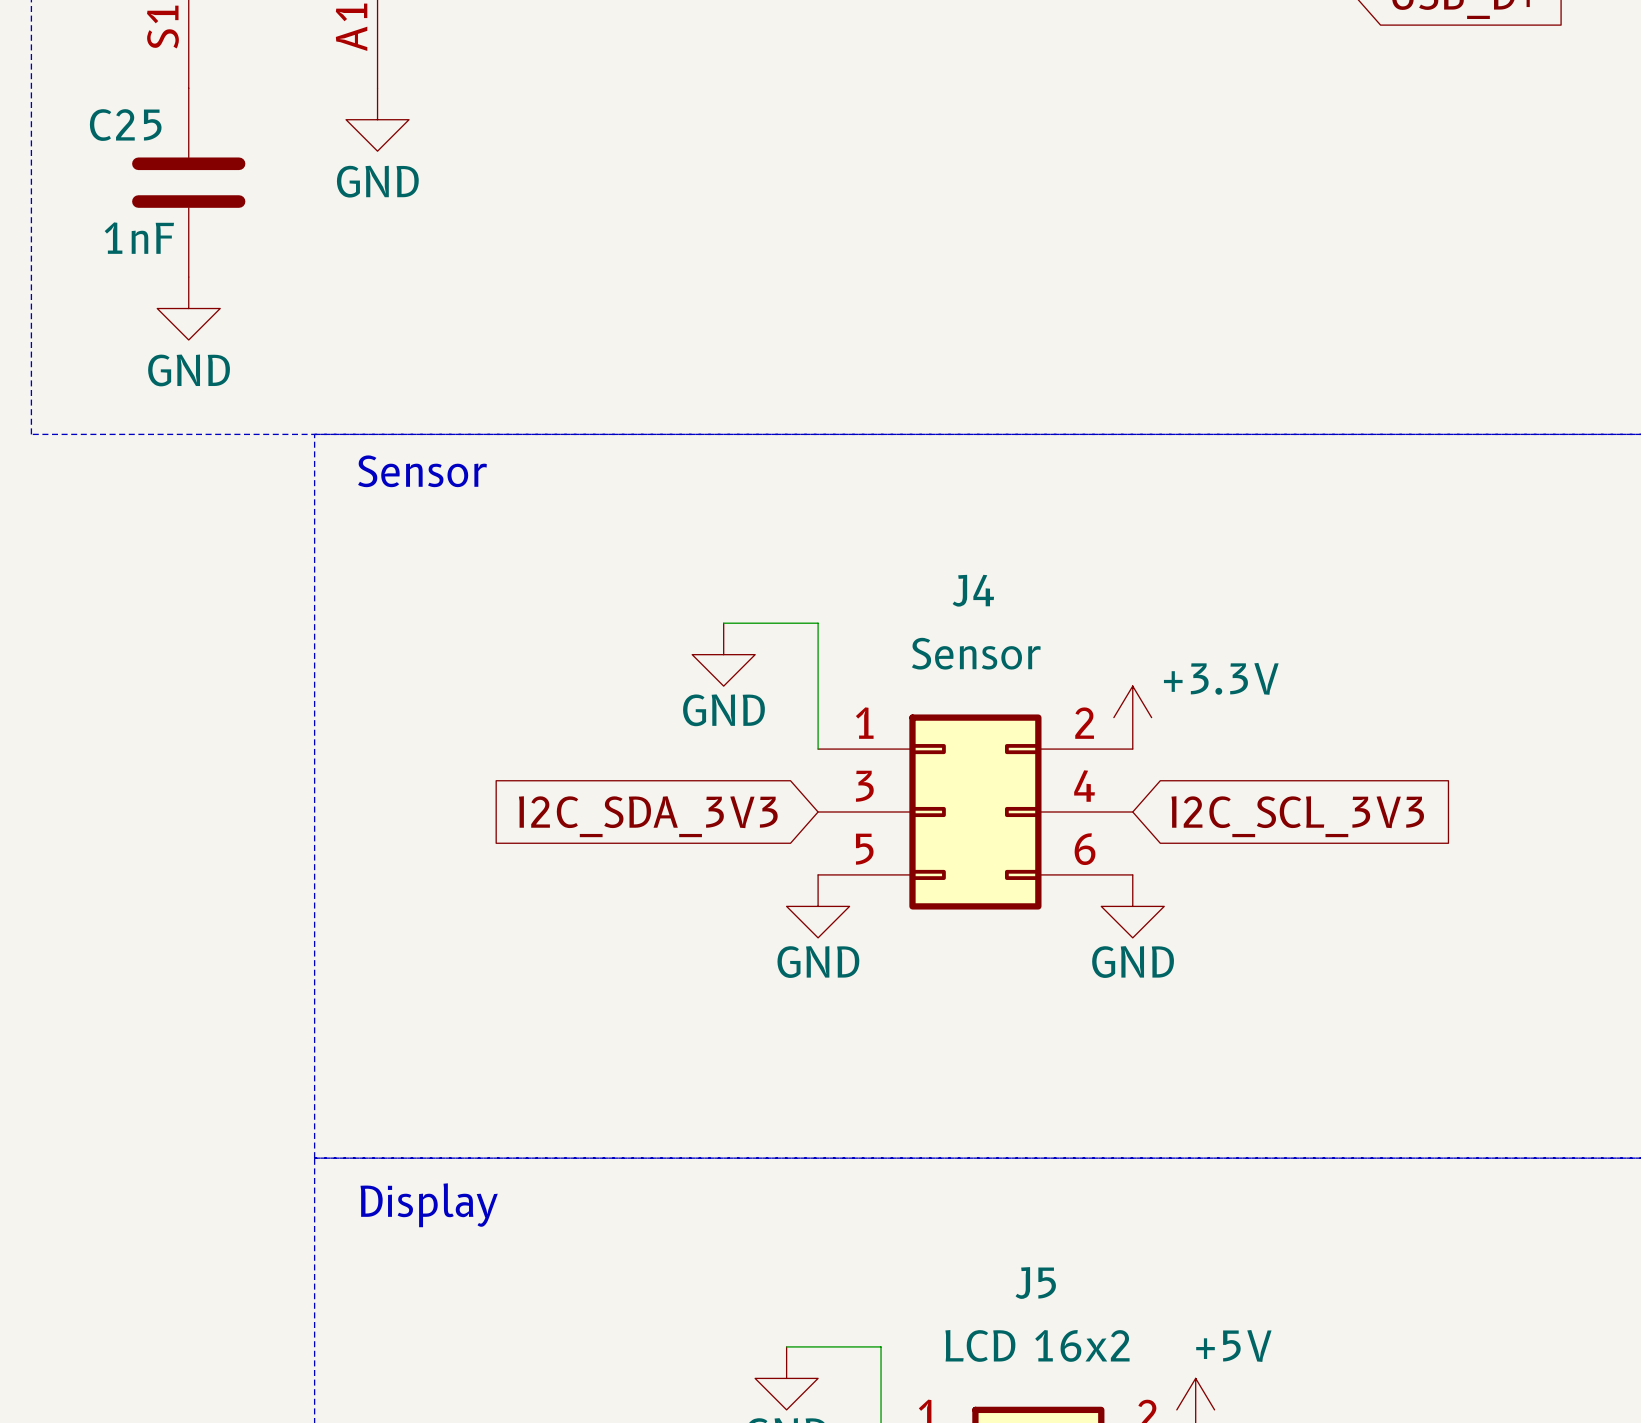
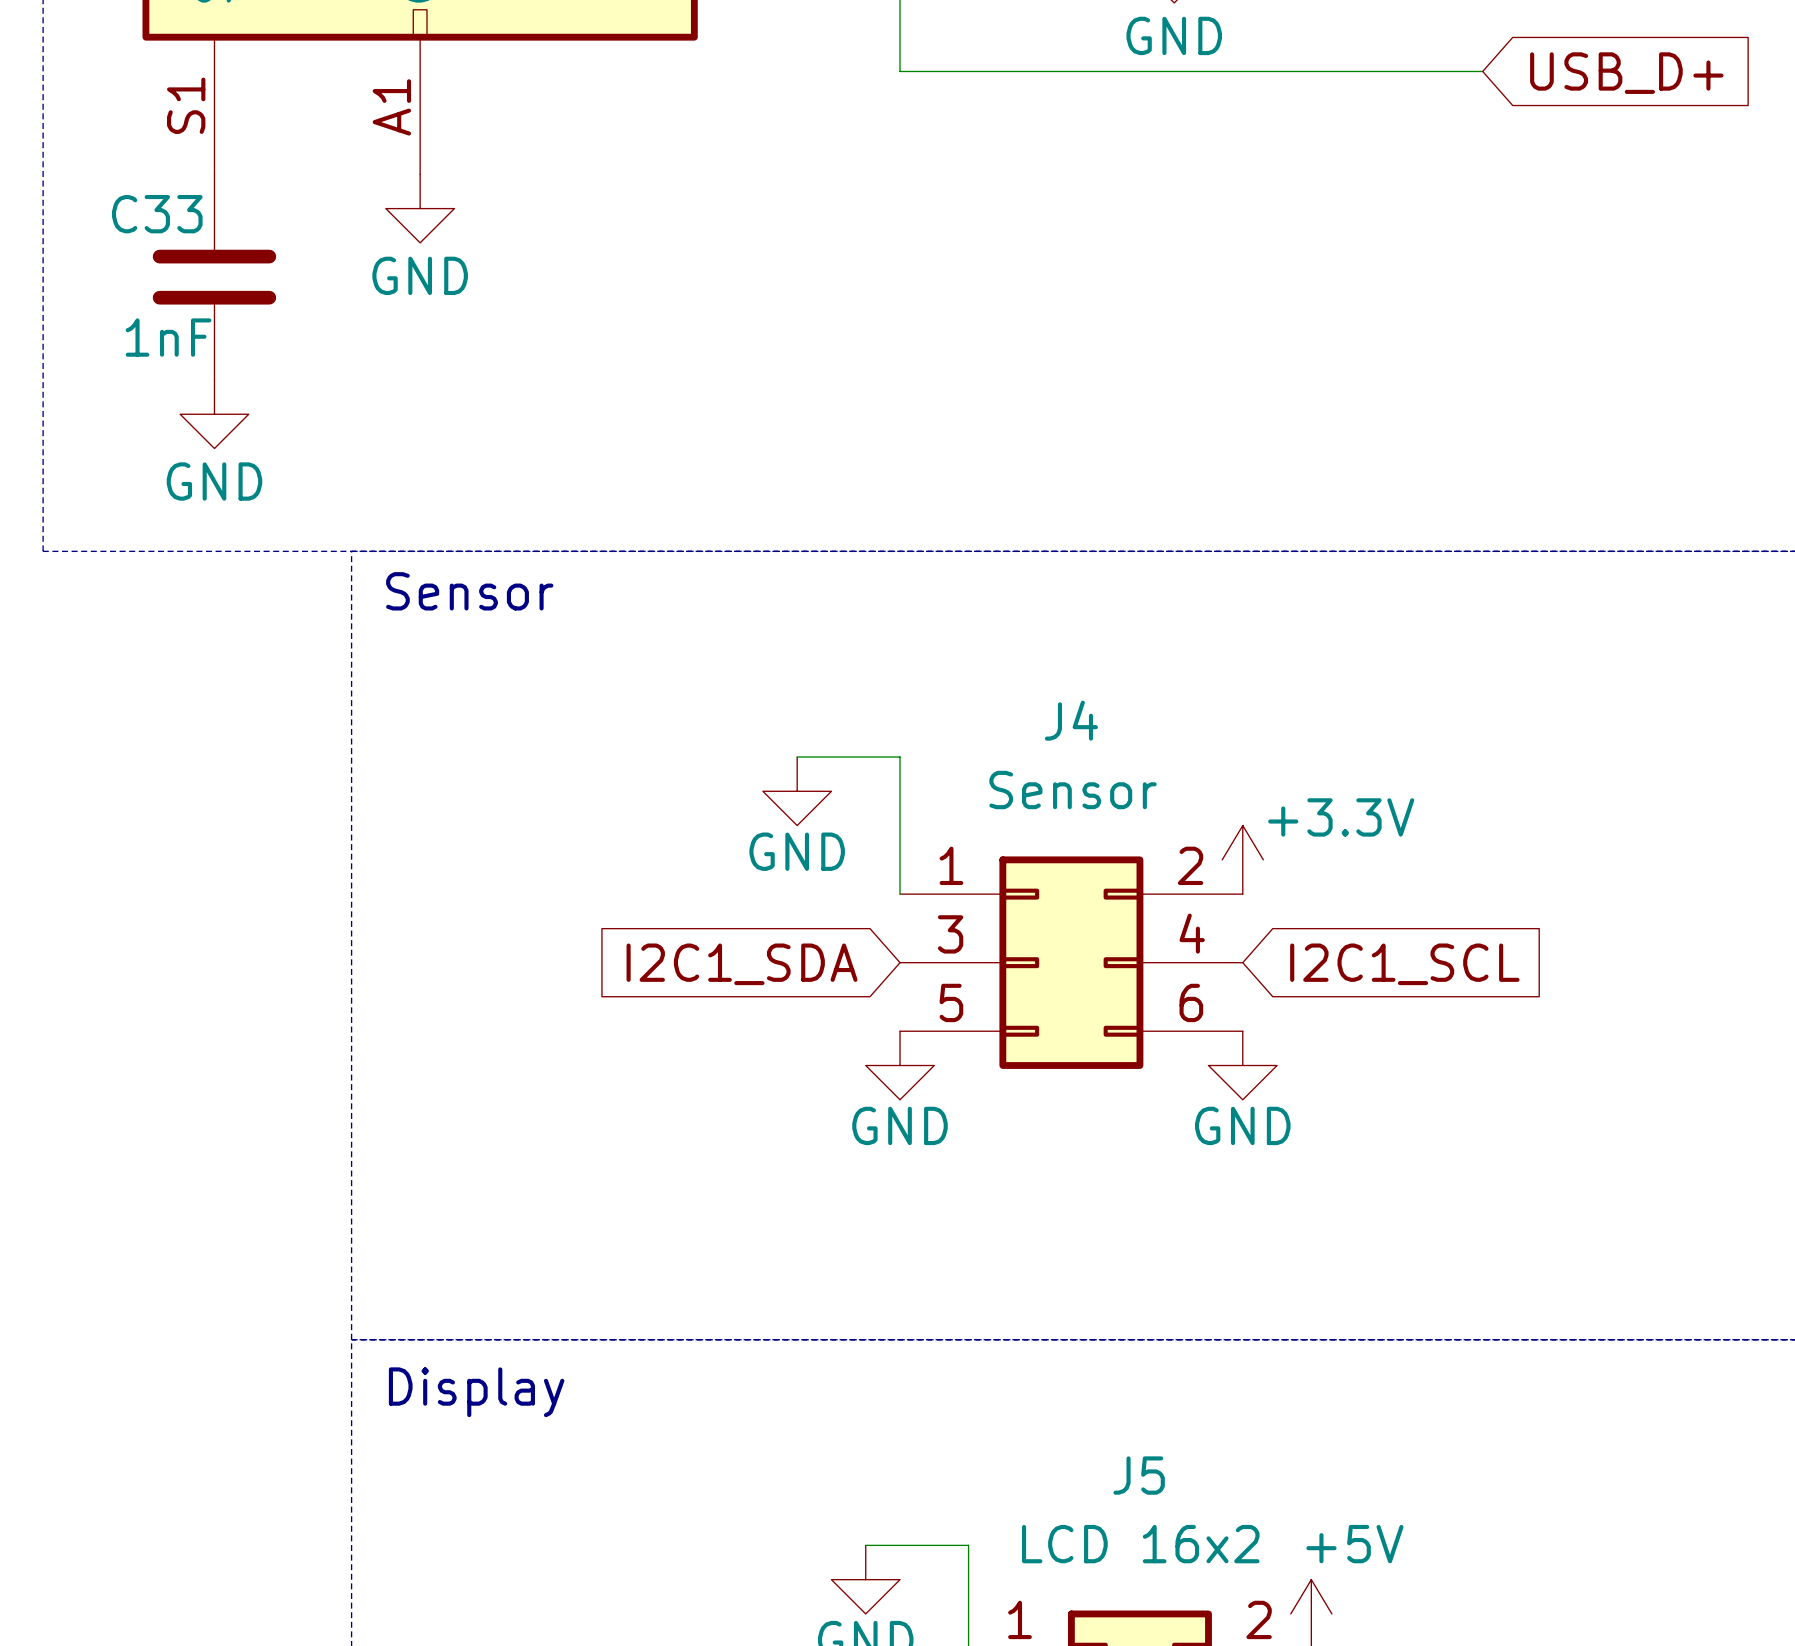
C25 name: C25 (125, 125) -> C33 (157, 214)
global label: I2C_SDA_3V3 (648, 816) -> I2C1_SDA (742, 964)
global label: I2C_SCL_3V3 (1297, 816) -> I2C1_SCL (1404, 964)

